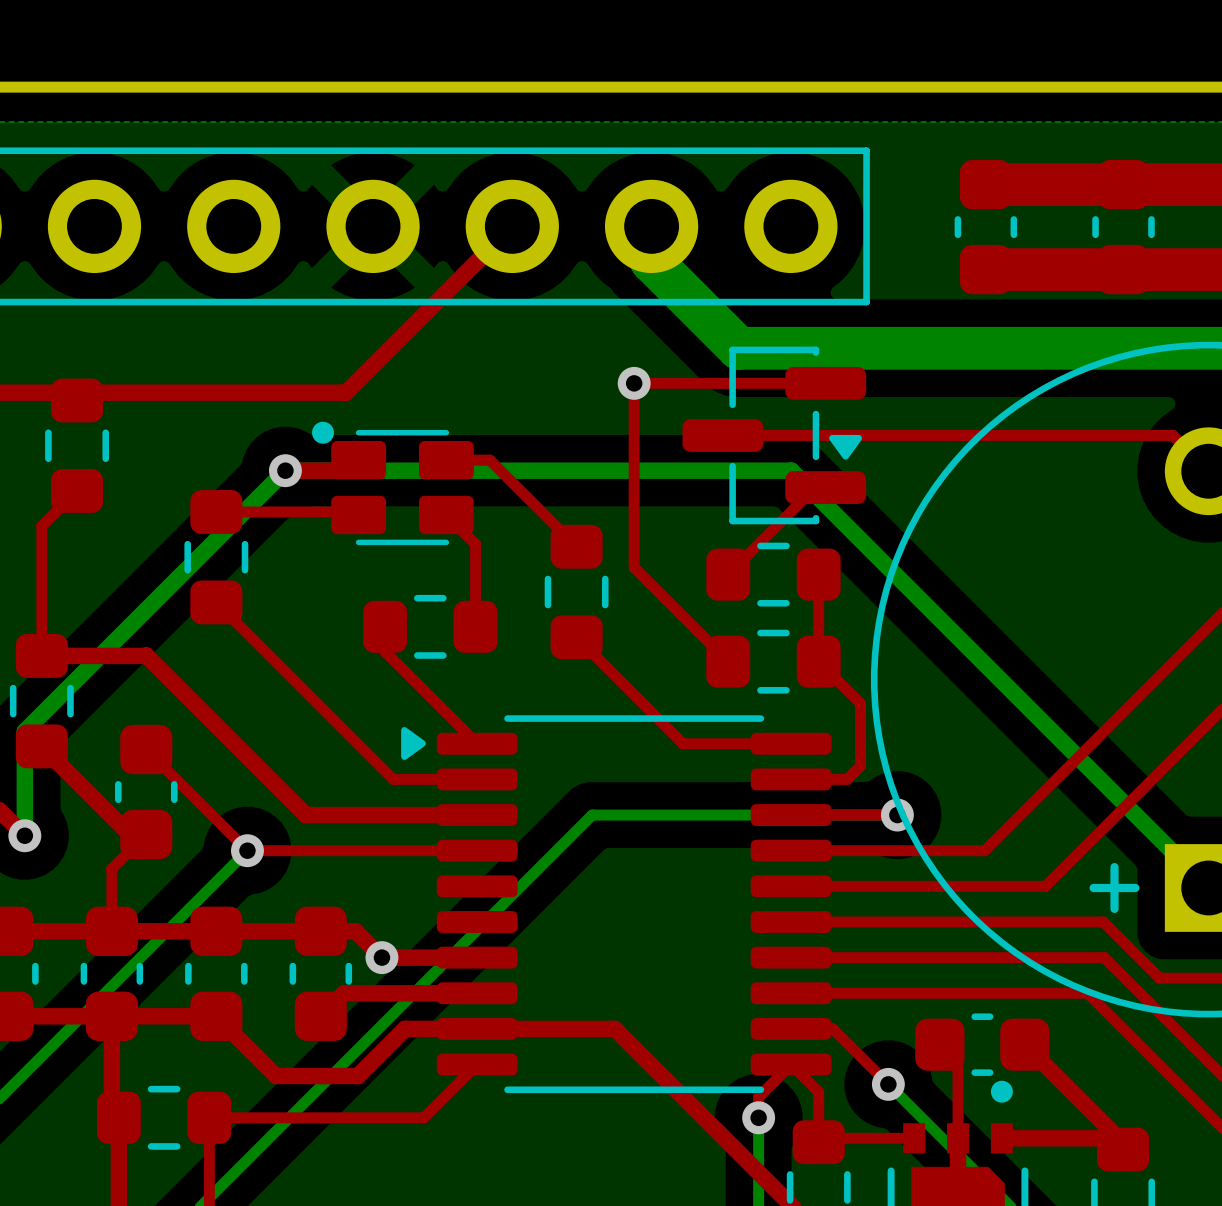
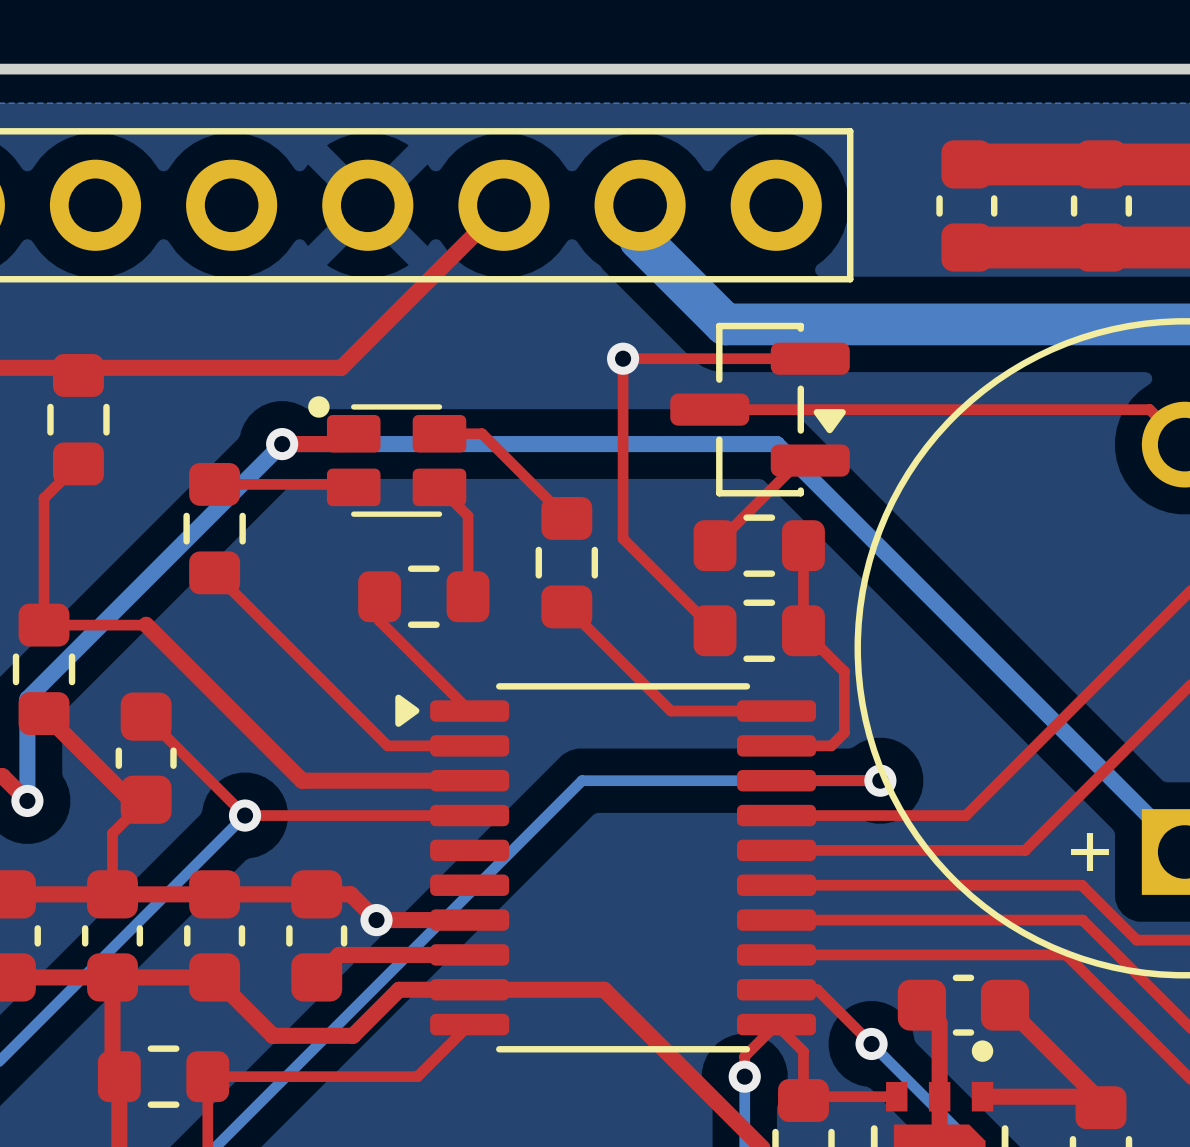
top track width: thick (41, 655) (145, 655) -> thin (44, 625) (145, 625)
top track width: thin (958, 1062) (958, 1138) -> thick (939, 1022) (939, 1096)

